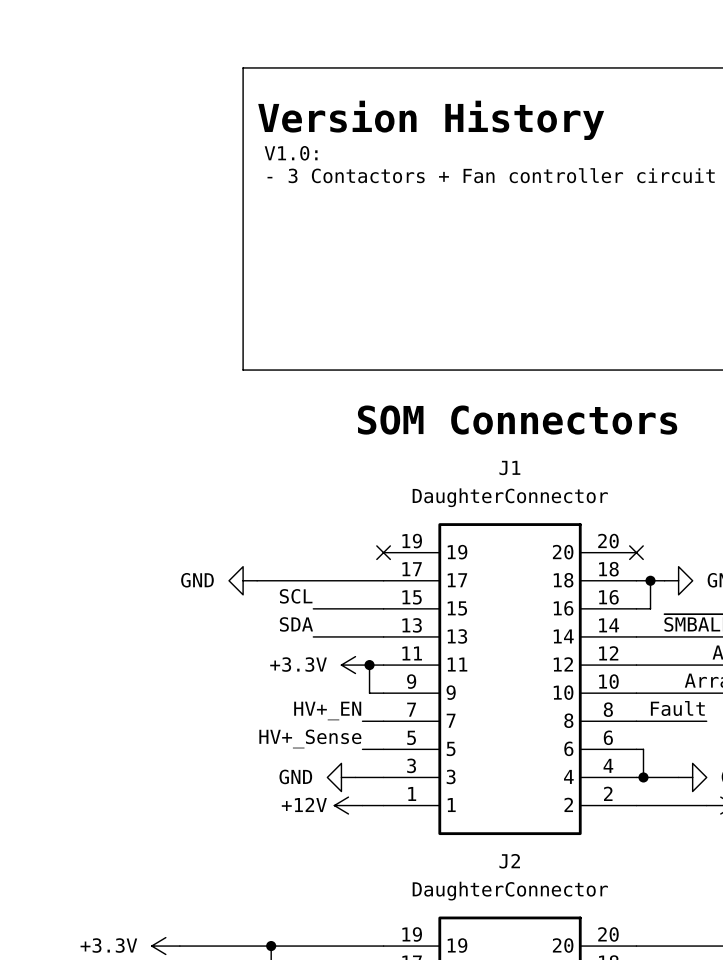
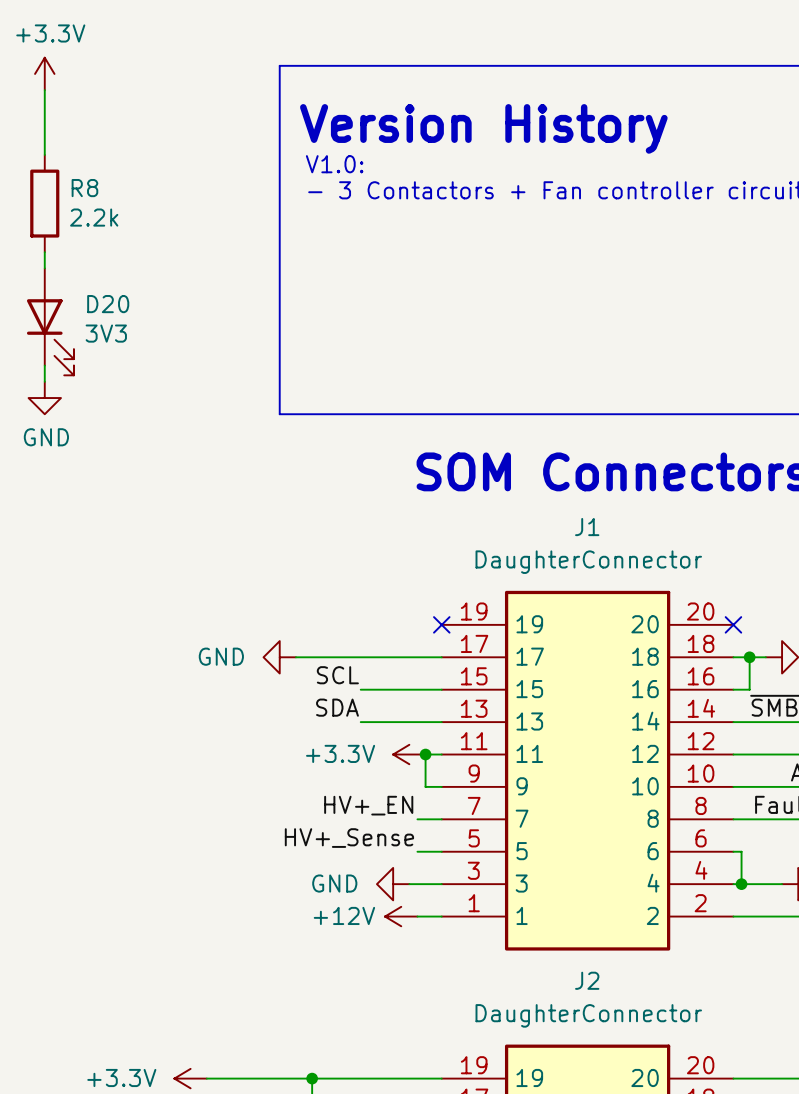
power symbol: none -> +3.3V (44, 73)
wire: none -> (44, 90) (44, 154)
R8: none -> 2.2k (44, 203)
wire: none -> (44, 252) (44, 268)
D20: none -> 3V3 (50, 321)
wire: none -> (44, 365) (44, 381)
power symbol: none -> GND (44, 398)

